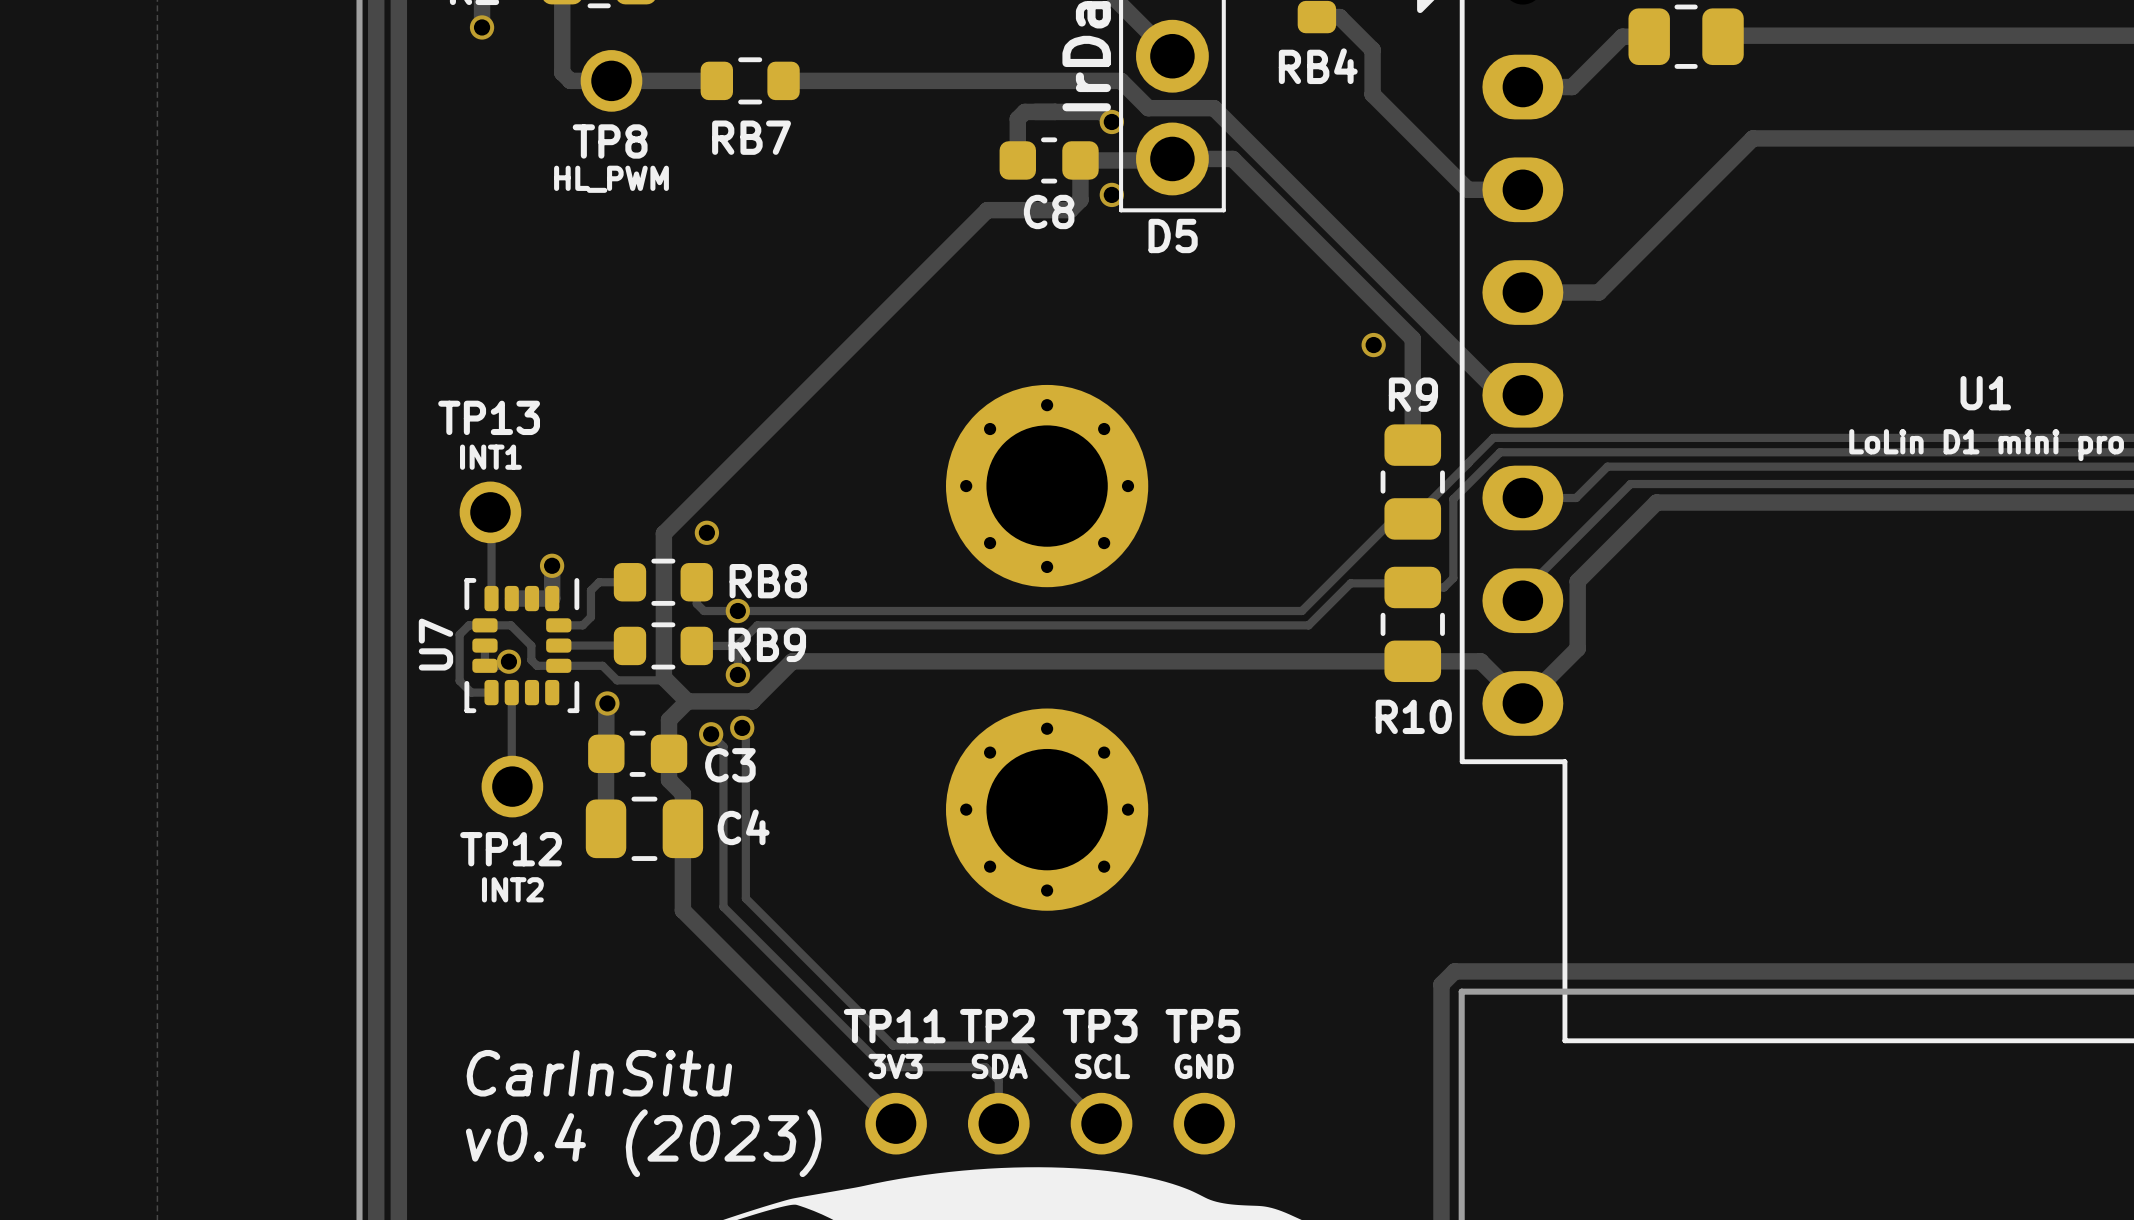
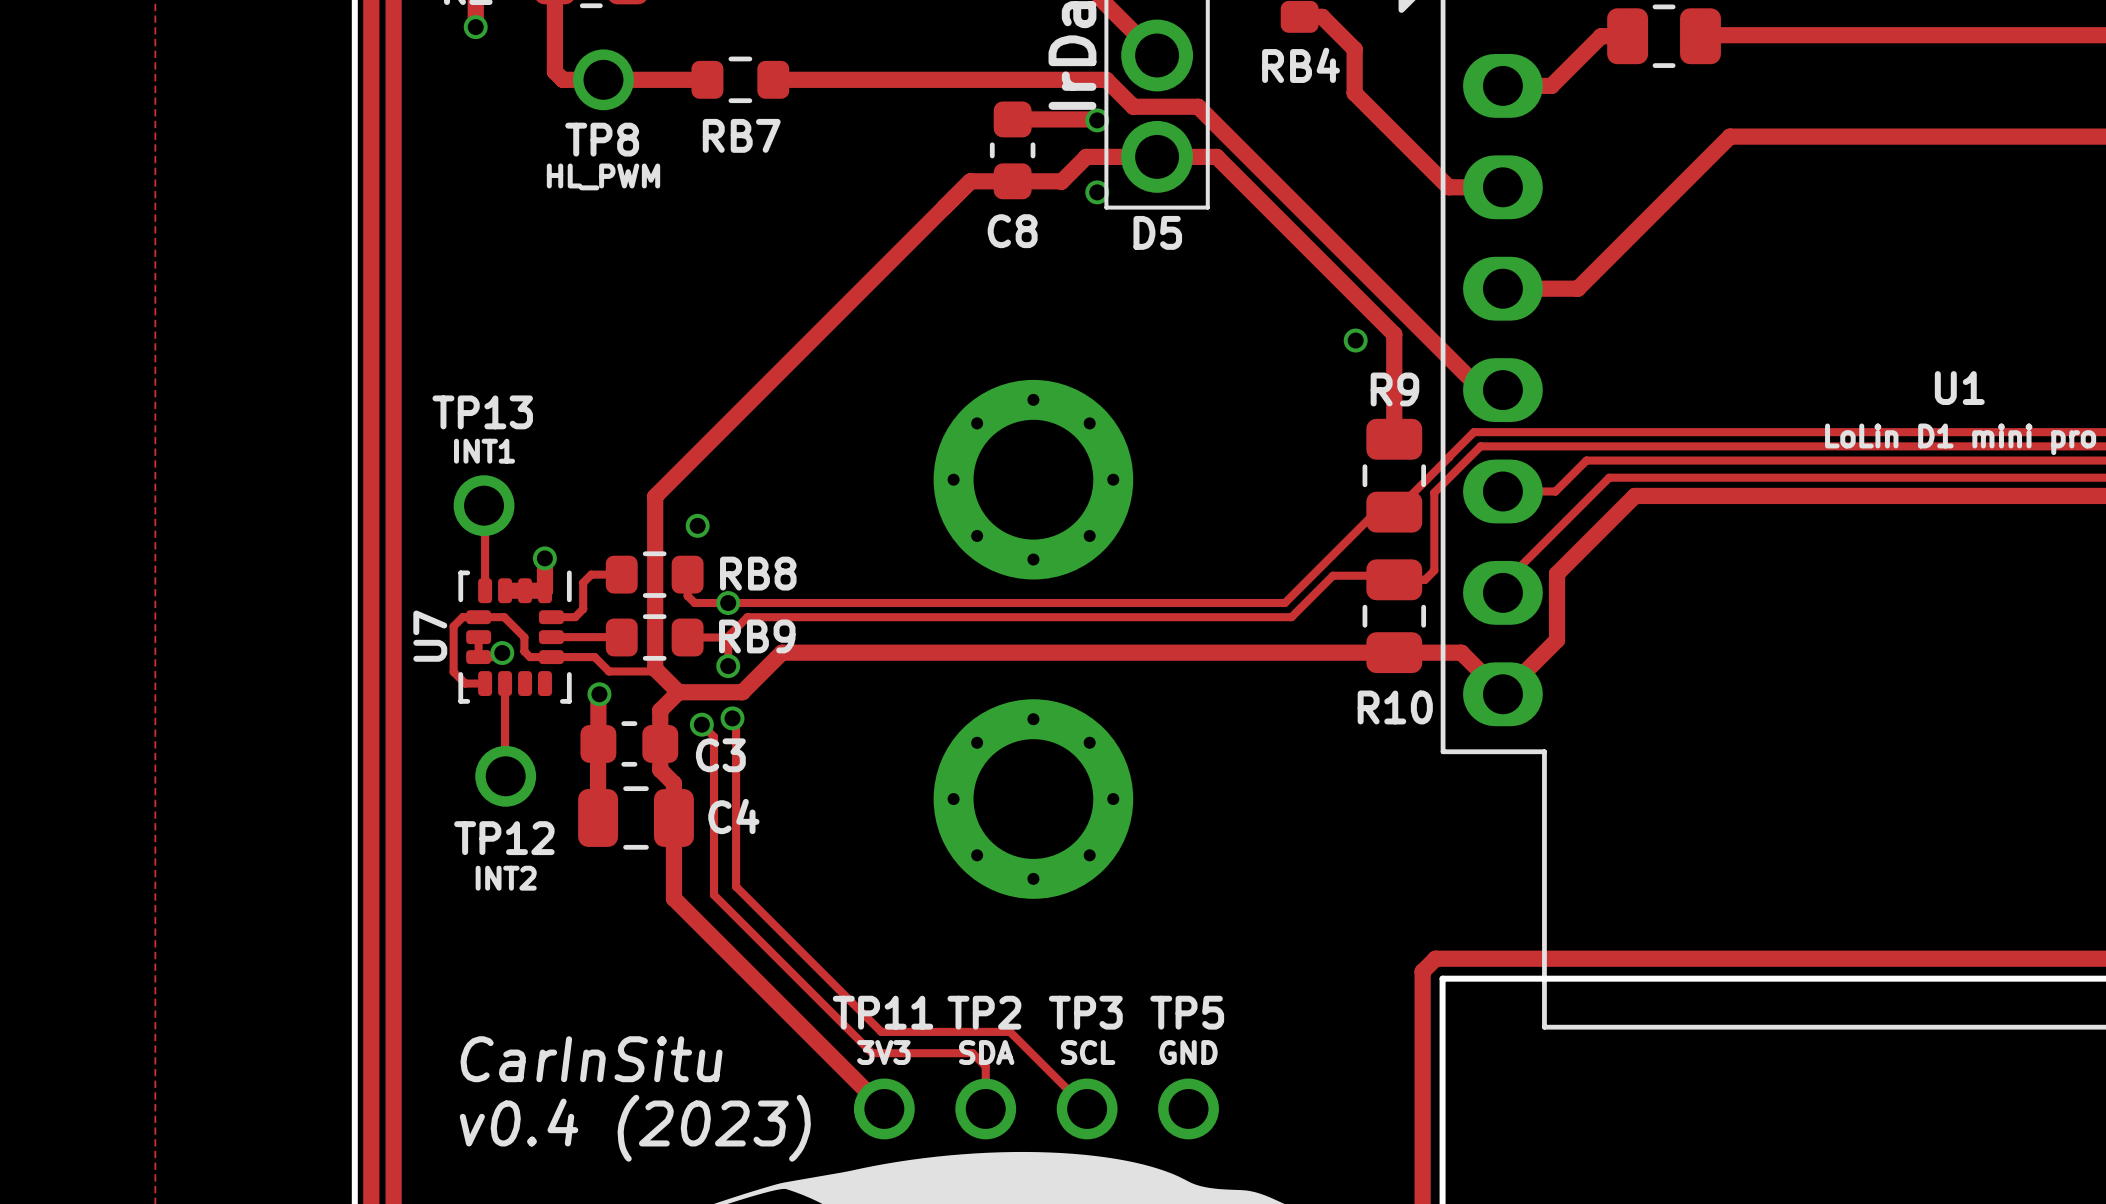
track: (1110, 121) (1101, 111) (1024, 111) (1017, 118) (1017, 160) -> (1096, 119) (1012, 119)
track: (1172, 158) (1080, 160) (1080, 199) (1070, 210) (987, 210) (663, 533) -> (1061, 181) (970, 181) (655, 496) (655, 526)
track: none -> (1157, 156) (1086, 156) (1061, 181)
C8 rotation: 0° (1049, 160) -> 90° clockwise (1012, 150)

